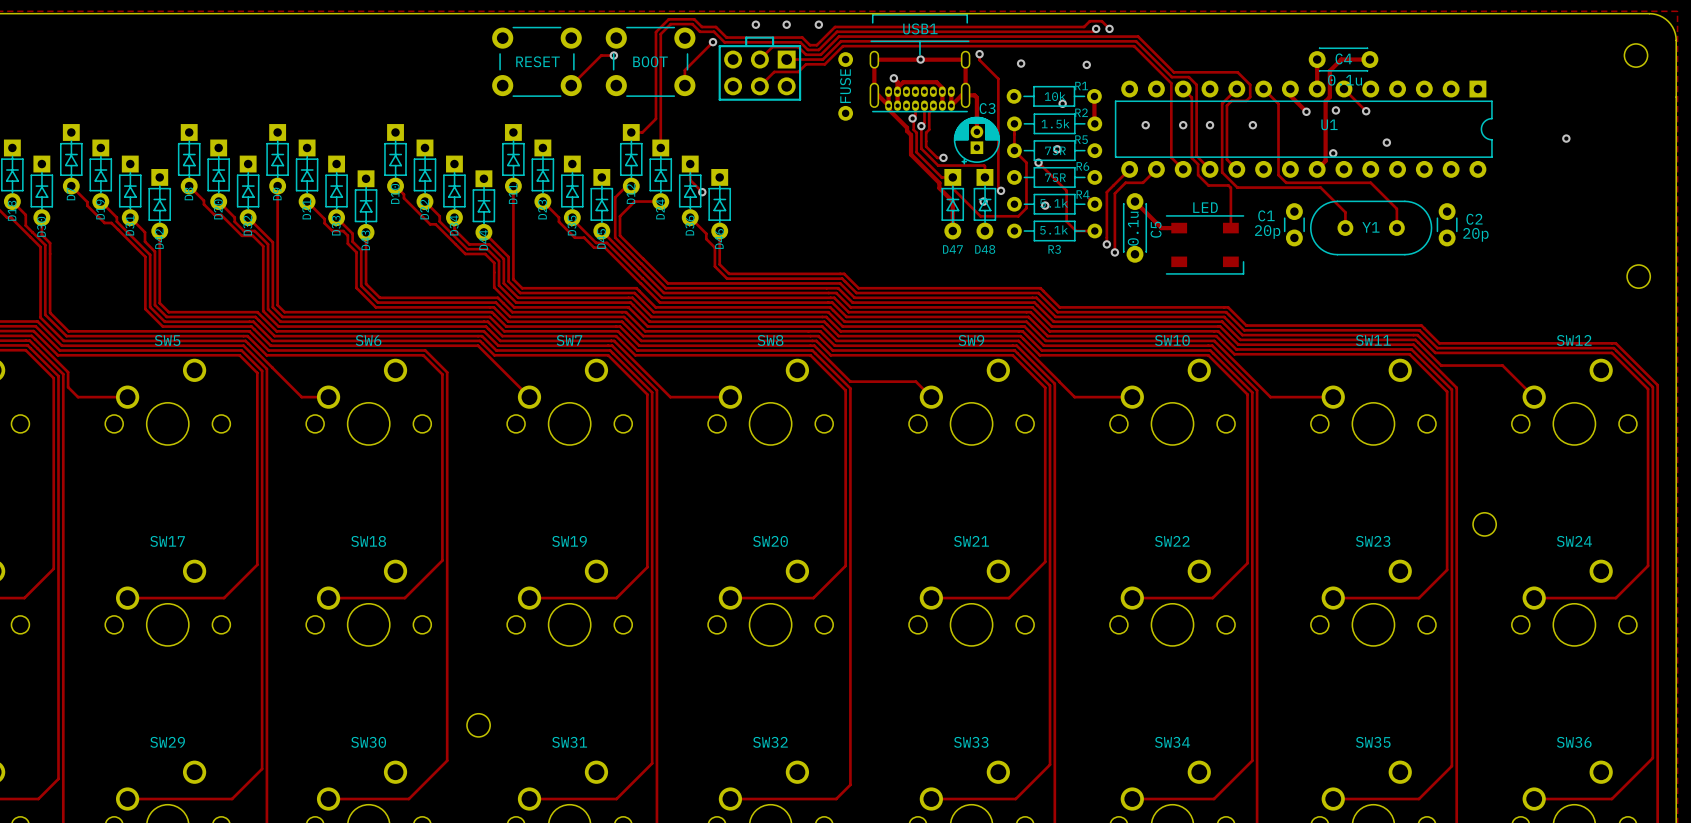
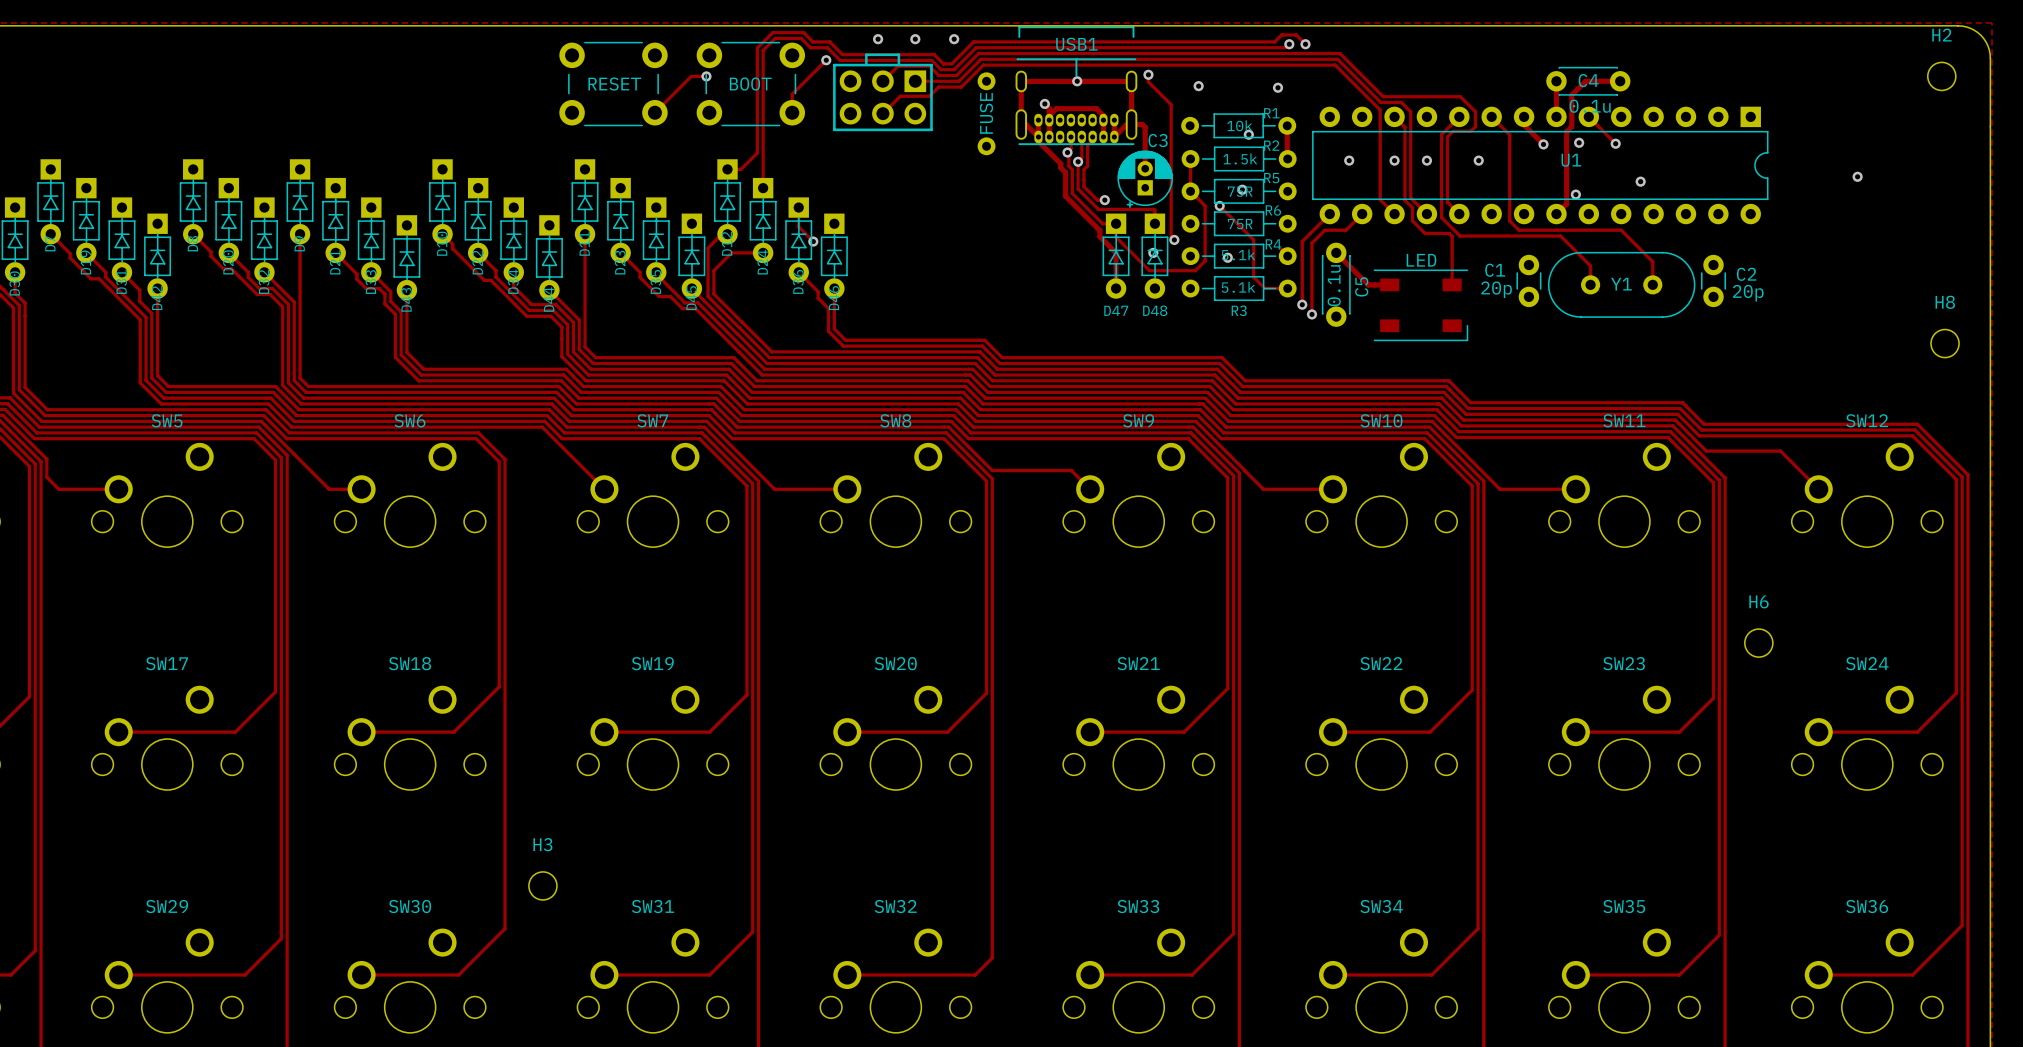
H2 name: none -> H2 (1941, 35)
H8 name: none -> H8 (1945, 302)
H6 name: none -> H6 (1758, 601)
H3 name: none -> H3 (542, 844)

